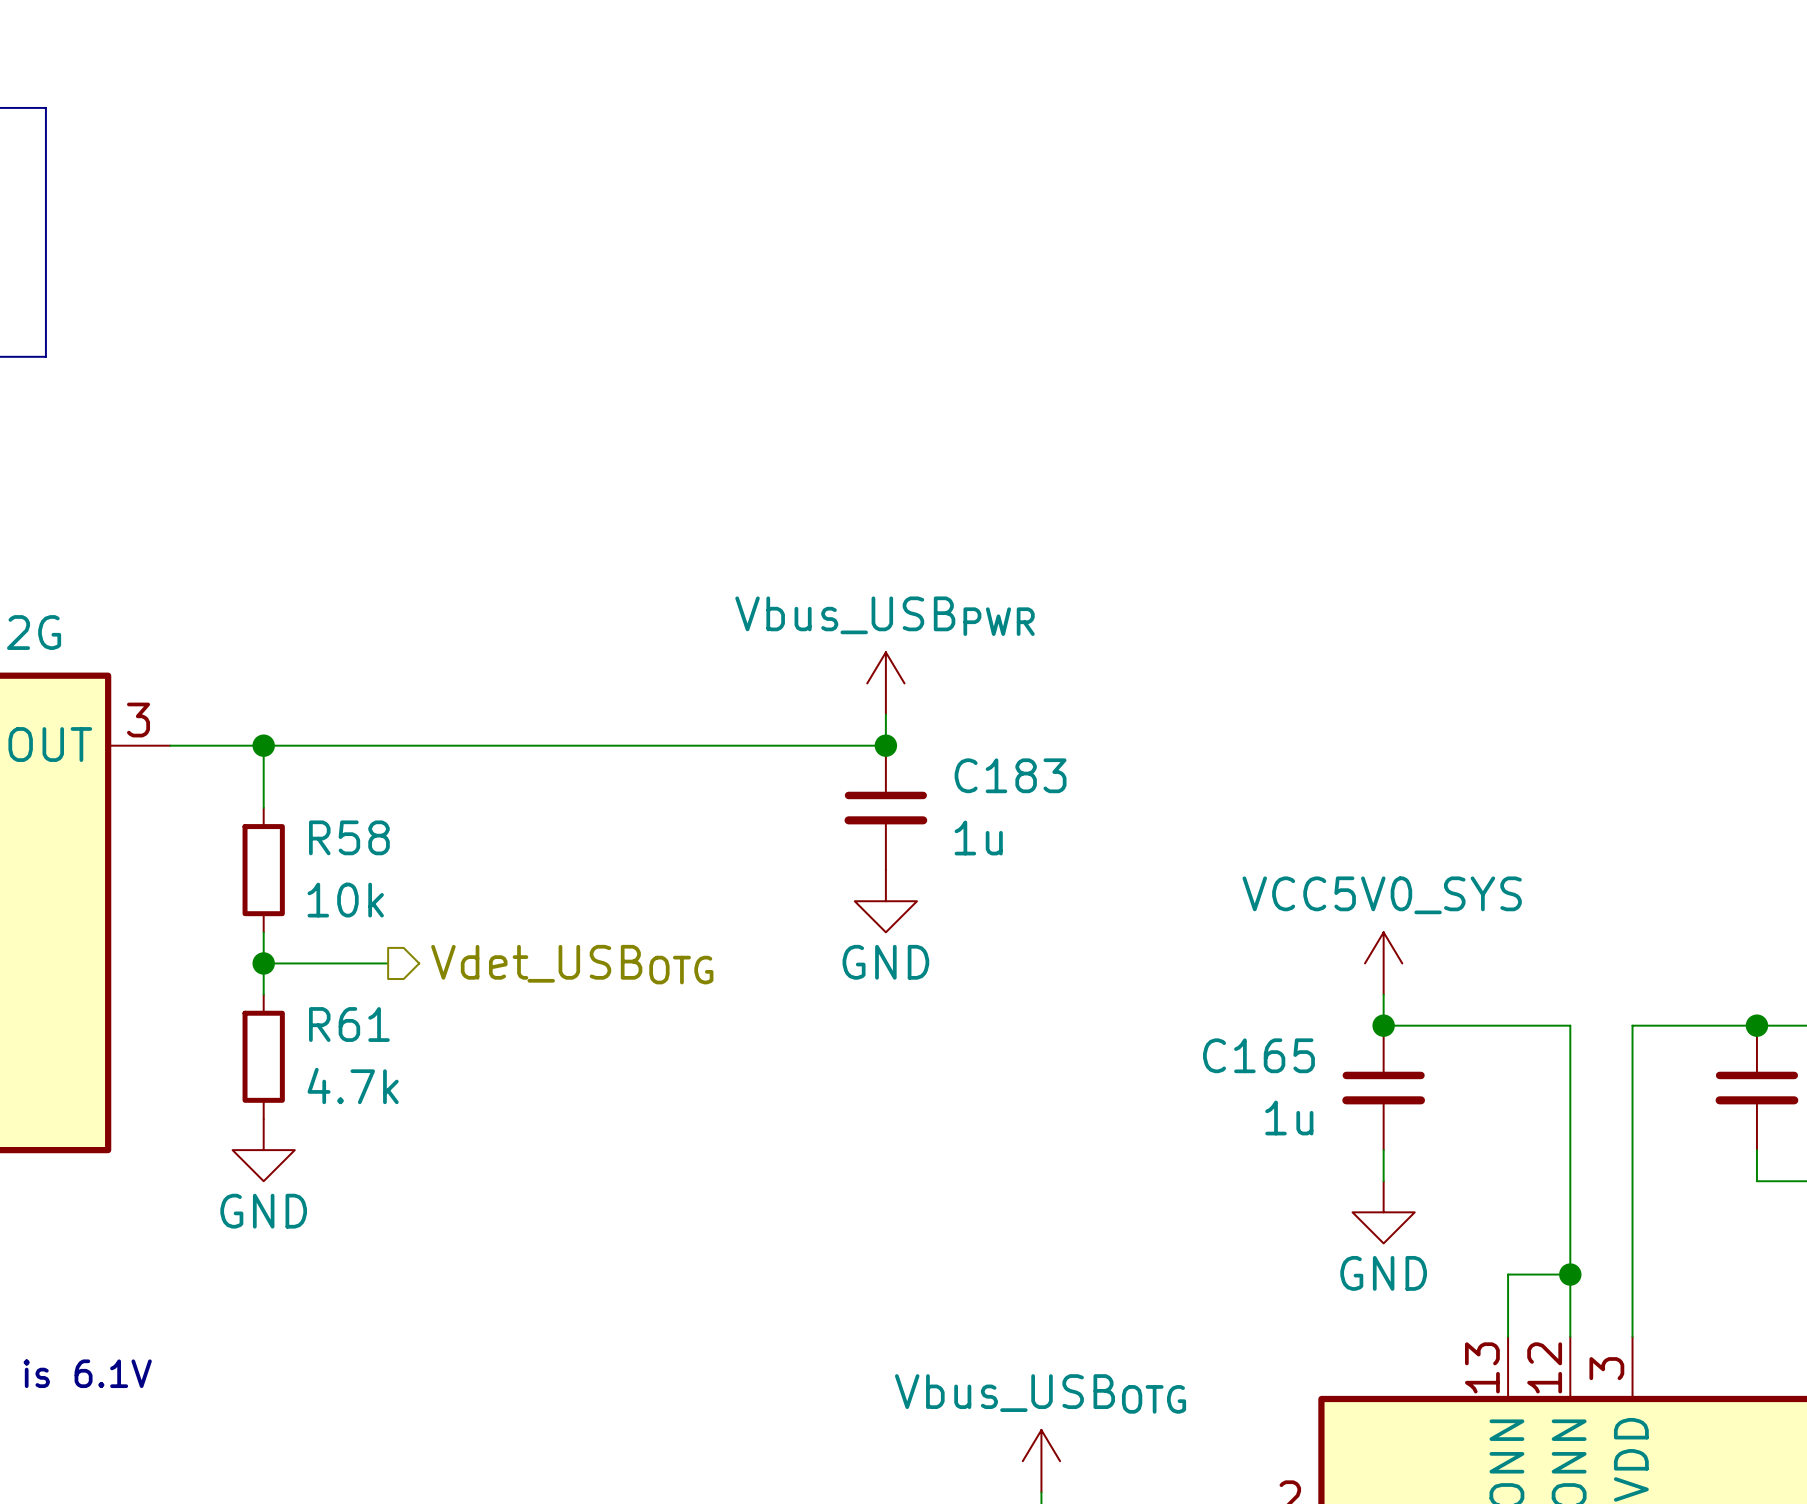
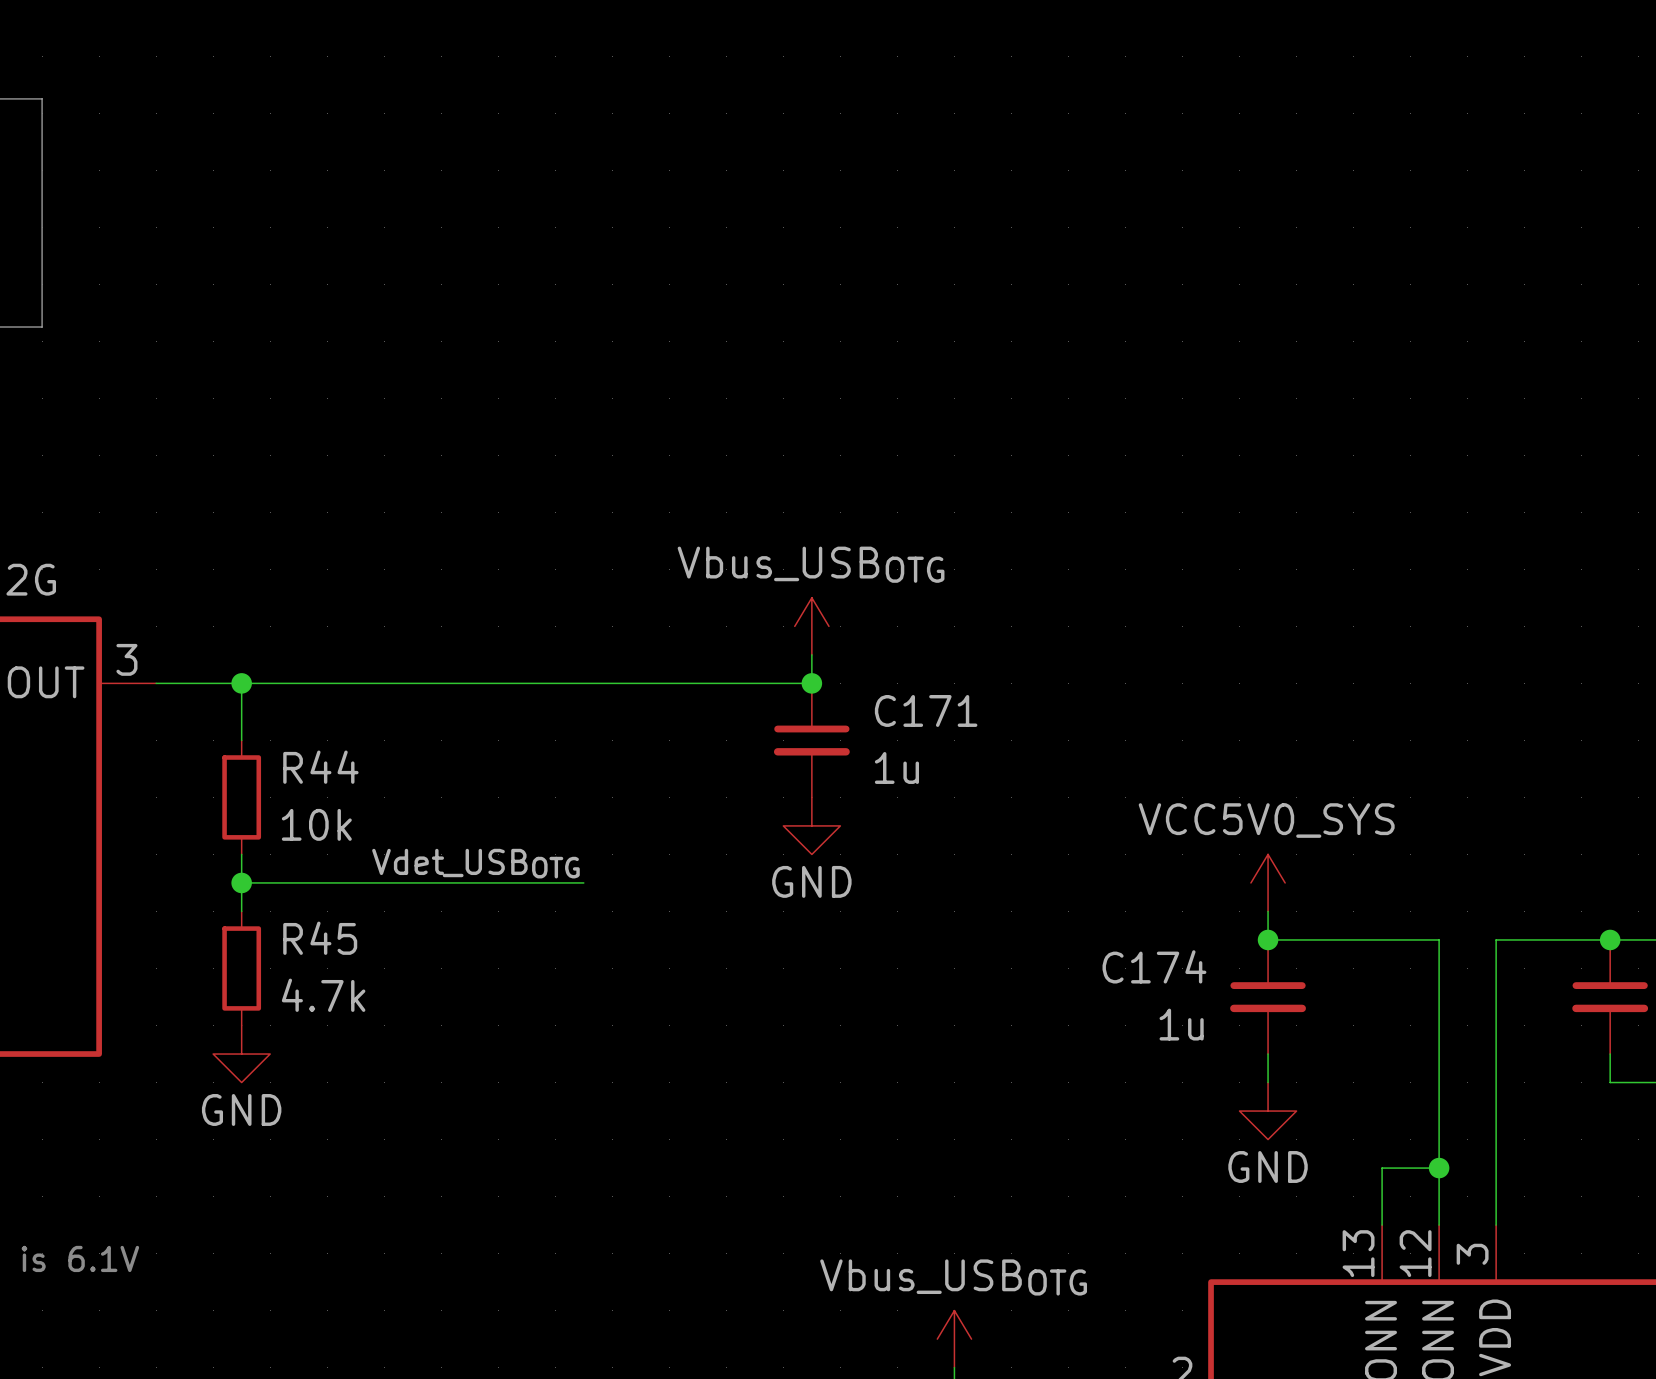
power symbol: Vbus_USBPWR (885, 683) -> Vbus_USBOTG (811, 626)
C183 name: C183 (1010, 775) -> C171 (926, 710)
R58 name: R58 (349, 837) -> R44 (320, 767)
label: none -> Vdet_USBOTG (475, 863)
wire: none -> (355, 882) (583, 882)
hierarchical label: Vdet_USBOTG (572, 964) -> none
R61 name: R61 (349, 1024) -> R45 (320, 938)
C165 name: C165 (1258, 1055) -> C174 (1154, 966)

